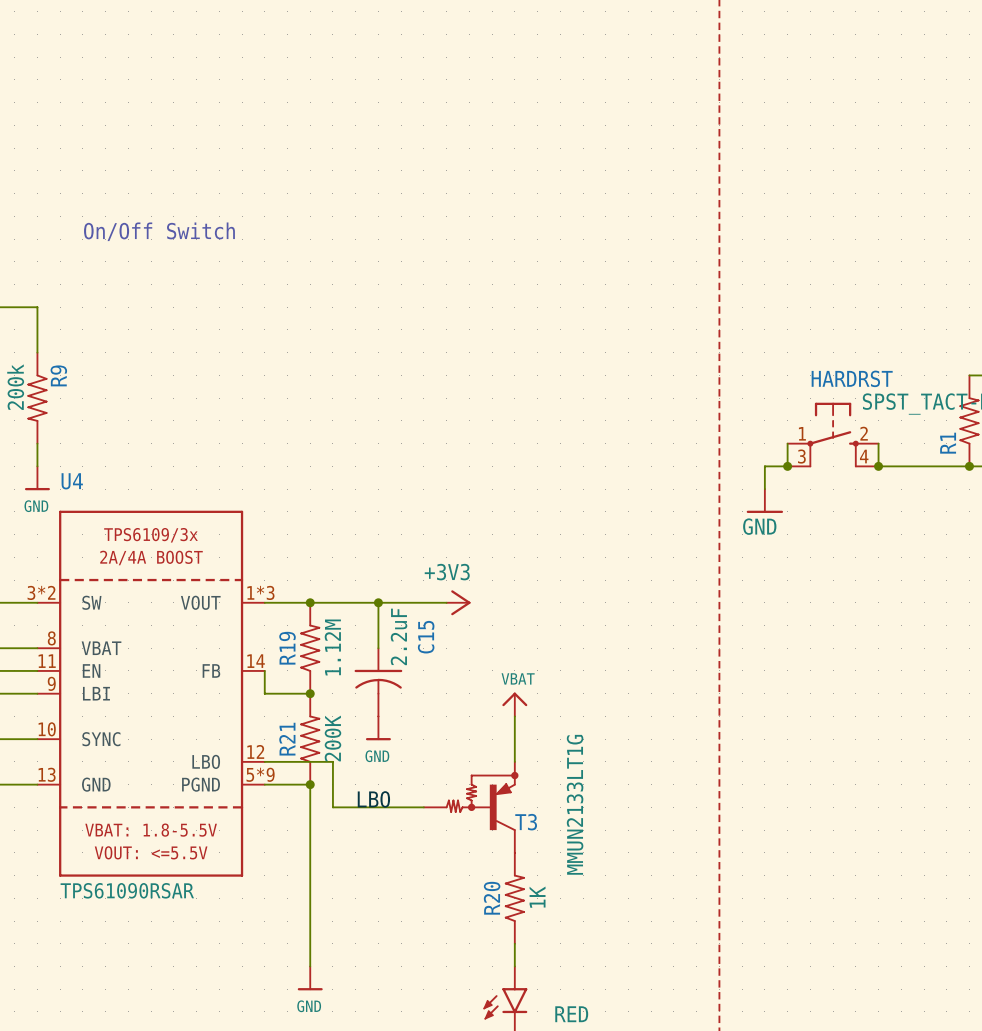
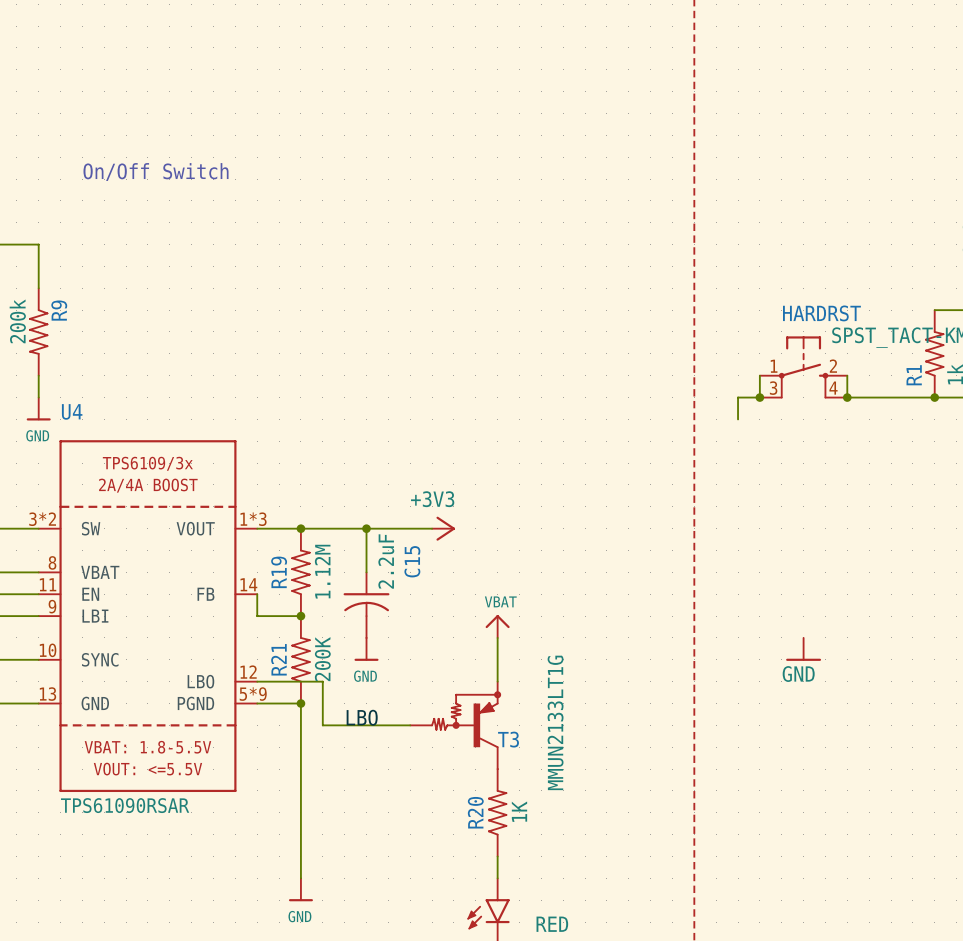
power symbol: GND (764, 501) -> none
power symbol: none -> GND (803, 649)

